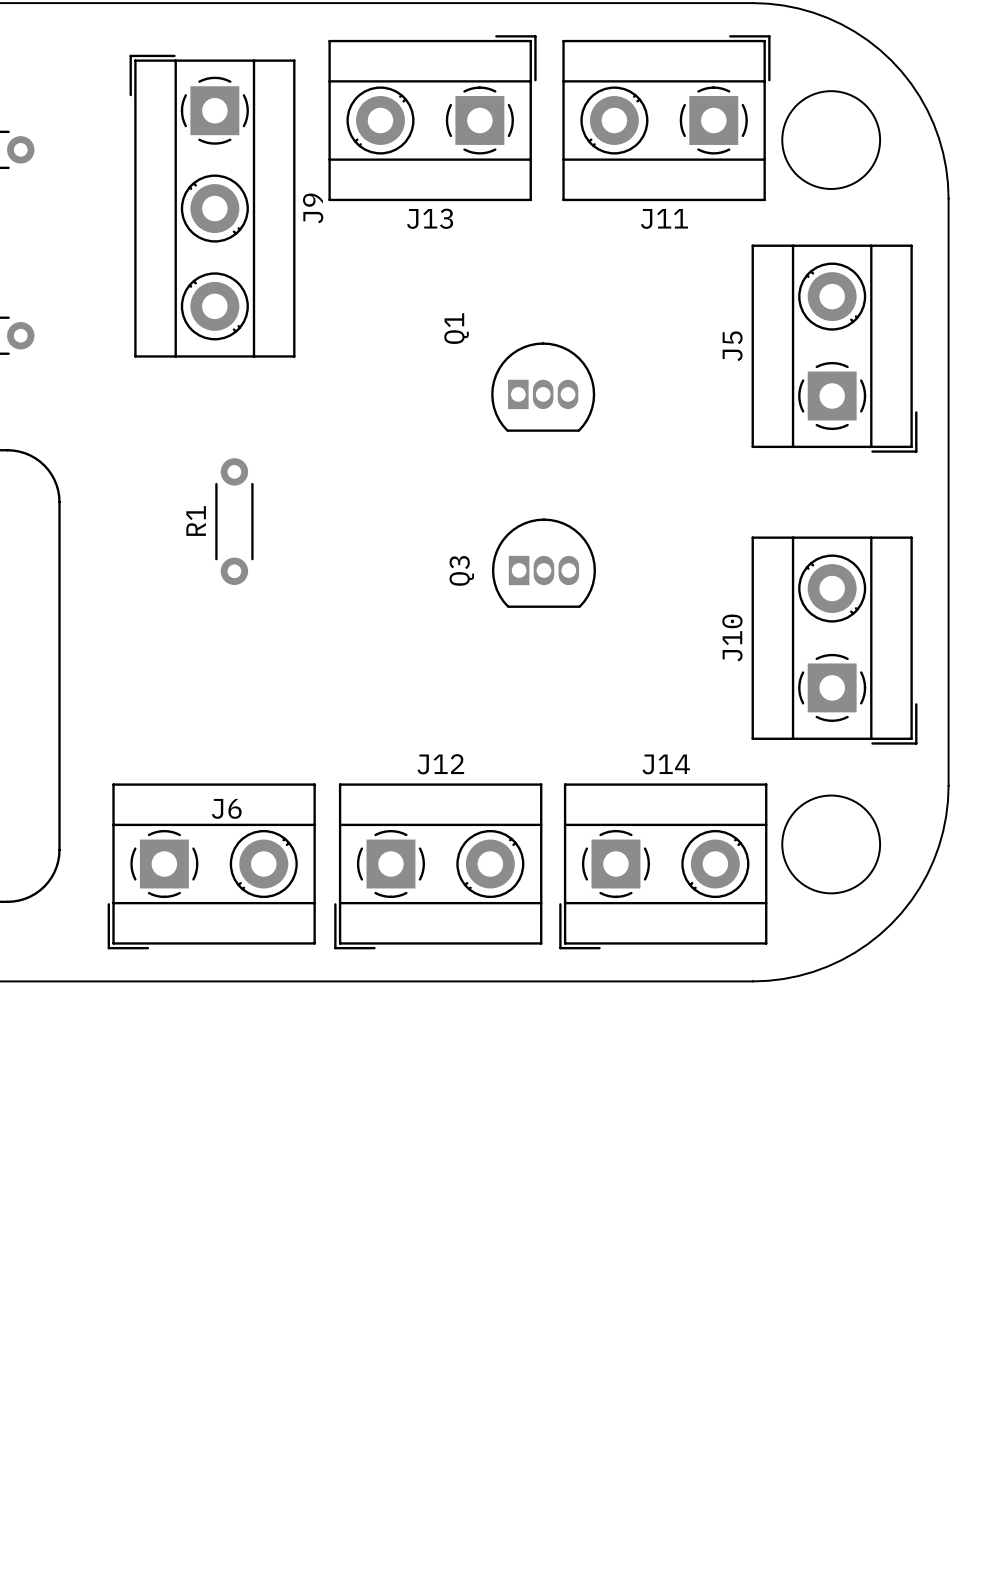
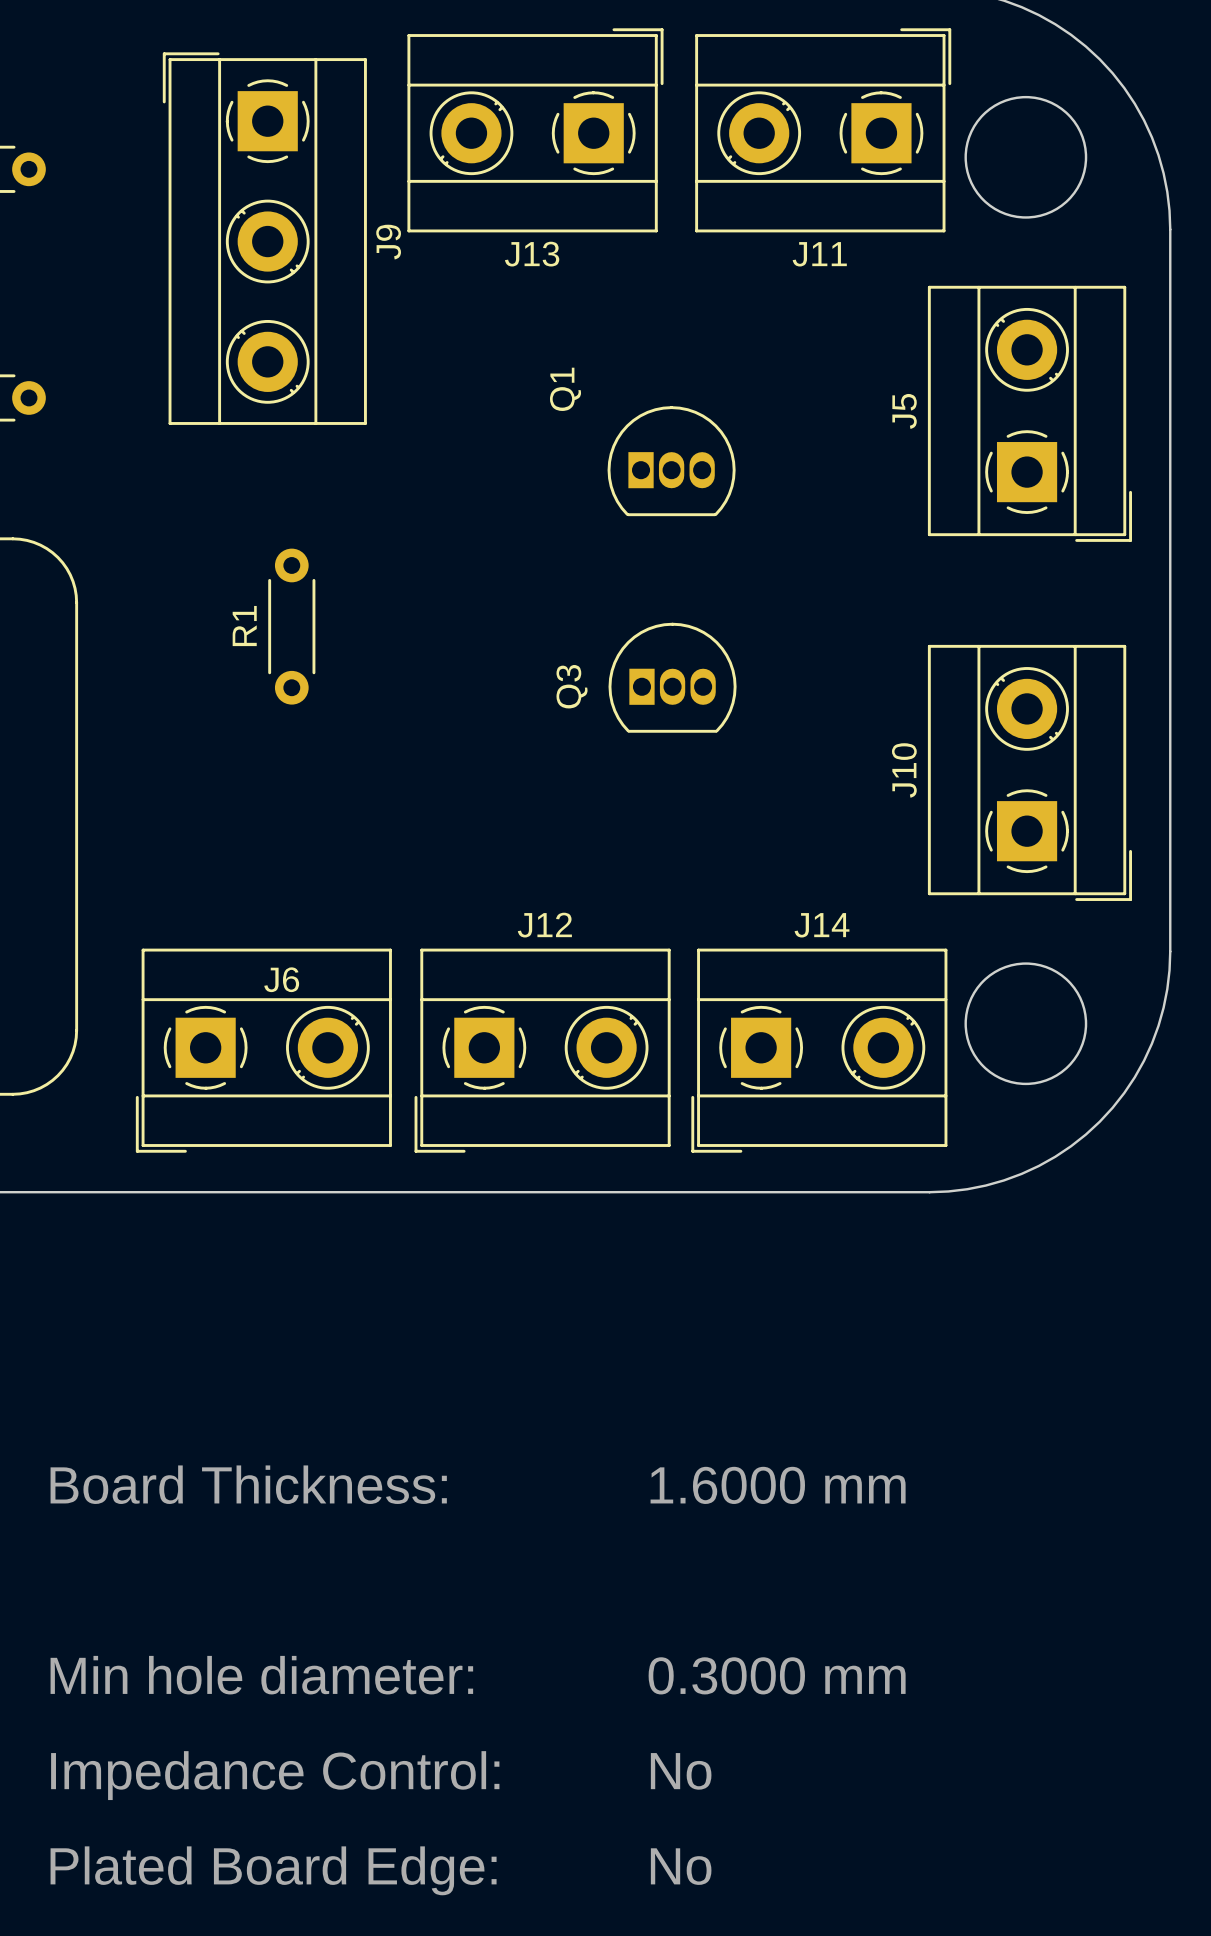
text: none -> Board Thickness: (248, 1484)
text: none -> 1.6000 mm (778, 1485)
text: none -> Min hole diameter: (261, 1675)
text: none -> 0.3000 mm (777, 1675)
text: none -> No (681, 1771)
text: none -> Impedance Control: (275, 1775)
text: none -> No (681, 1866)
text: none -> Plated Board Edge: (273, 1870)

